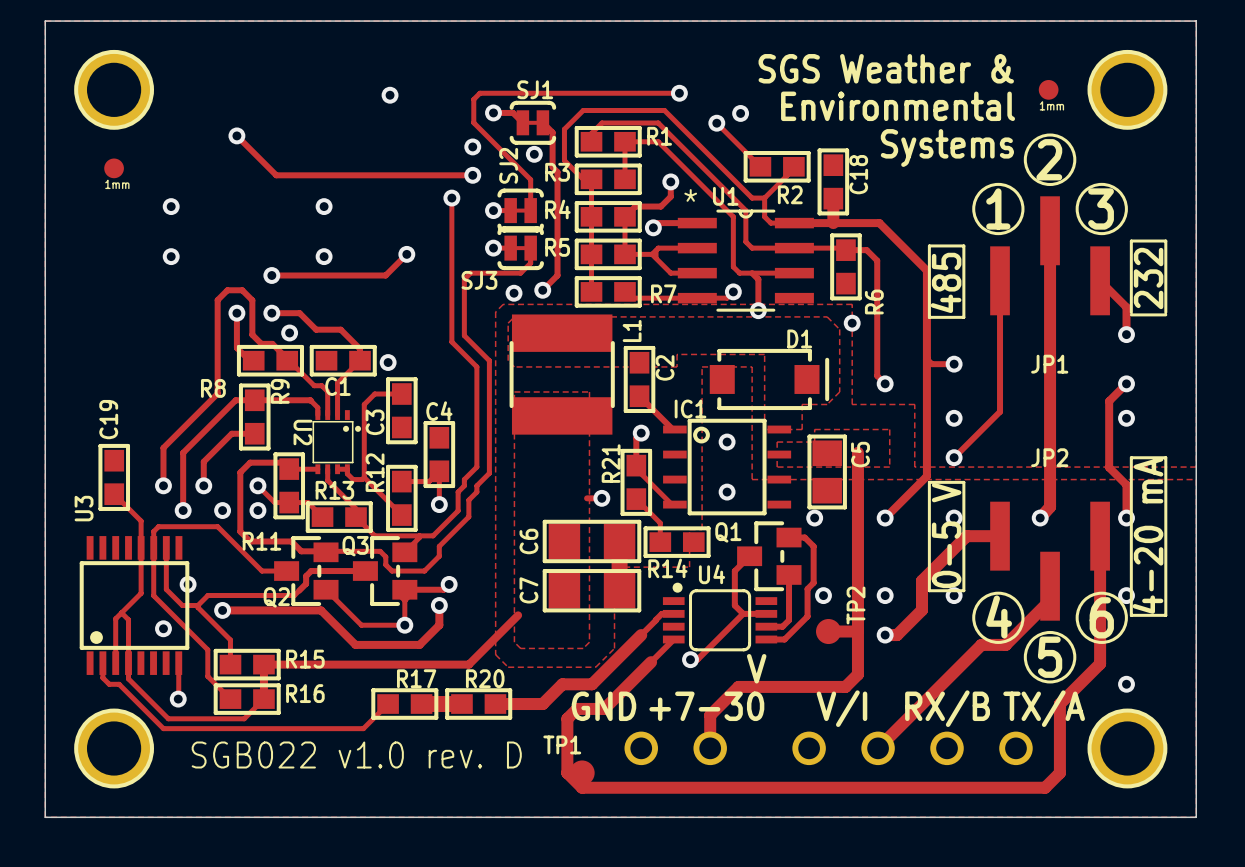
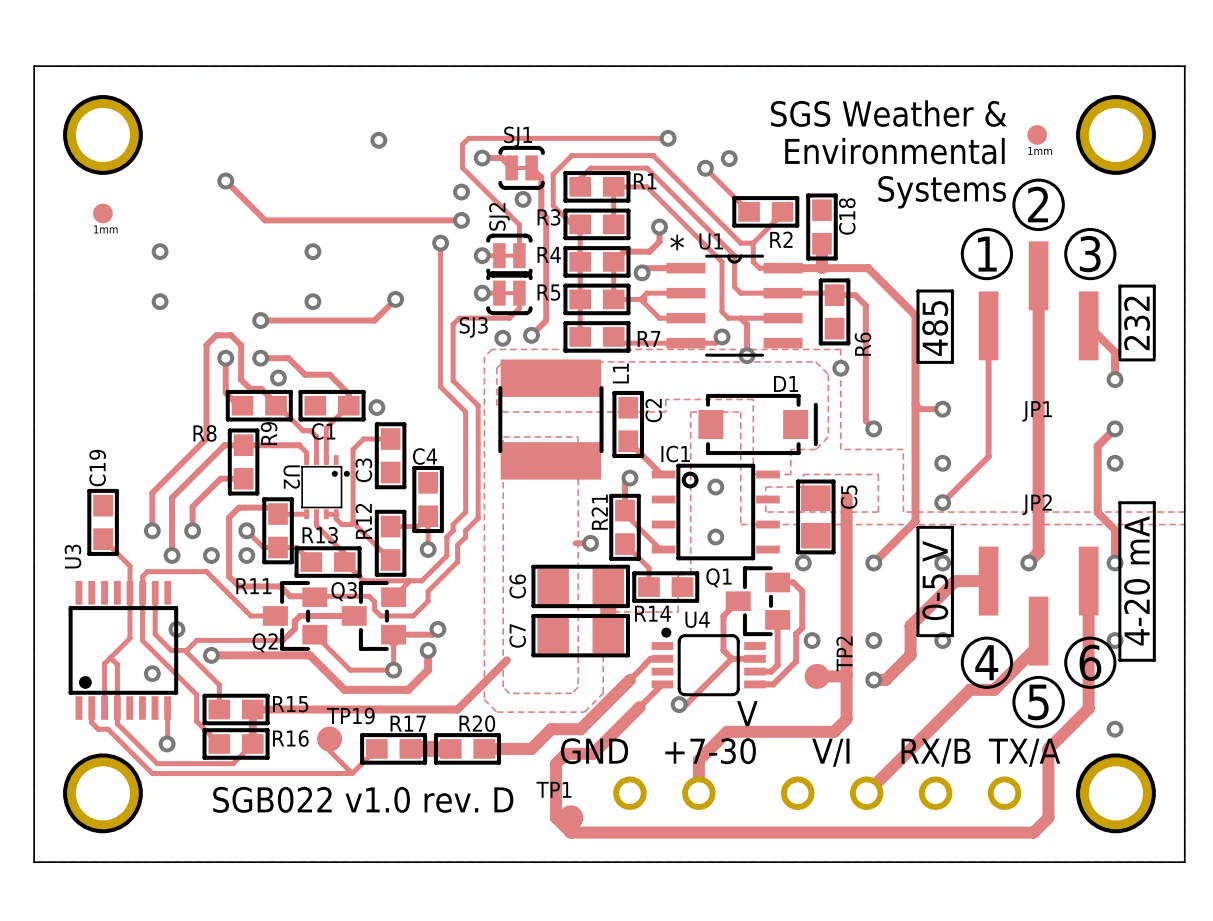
track: none -> (329, 739) (329, 750) (352, 773)
TP19: none -> (329, 739)

